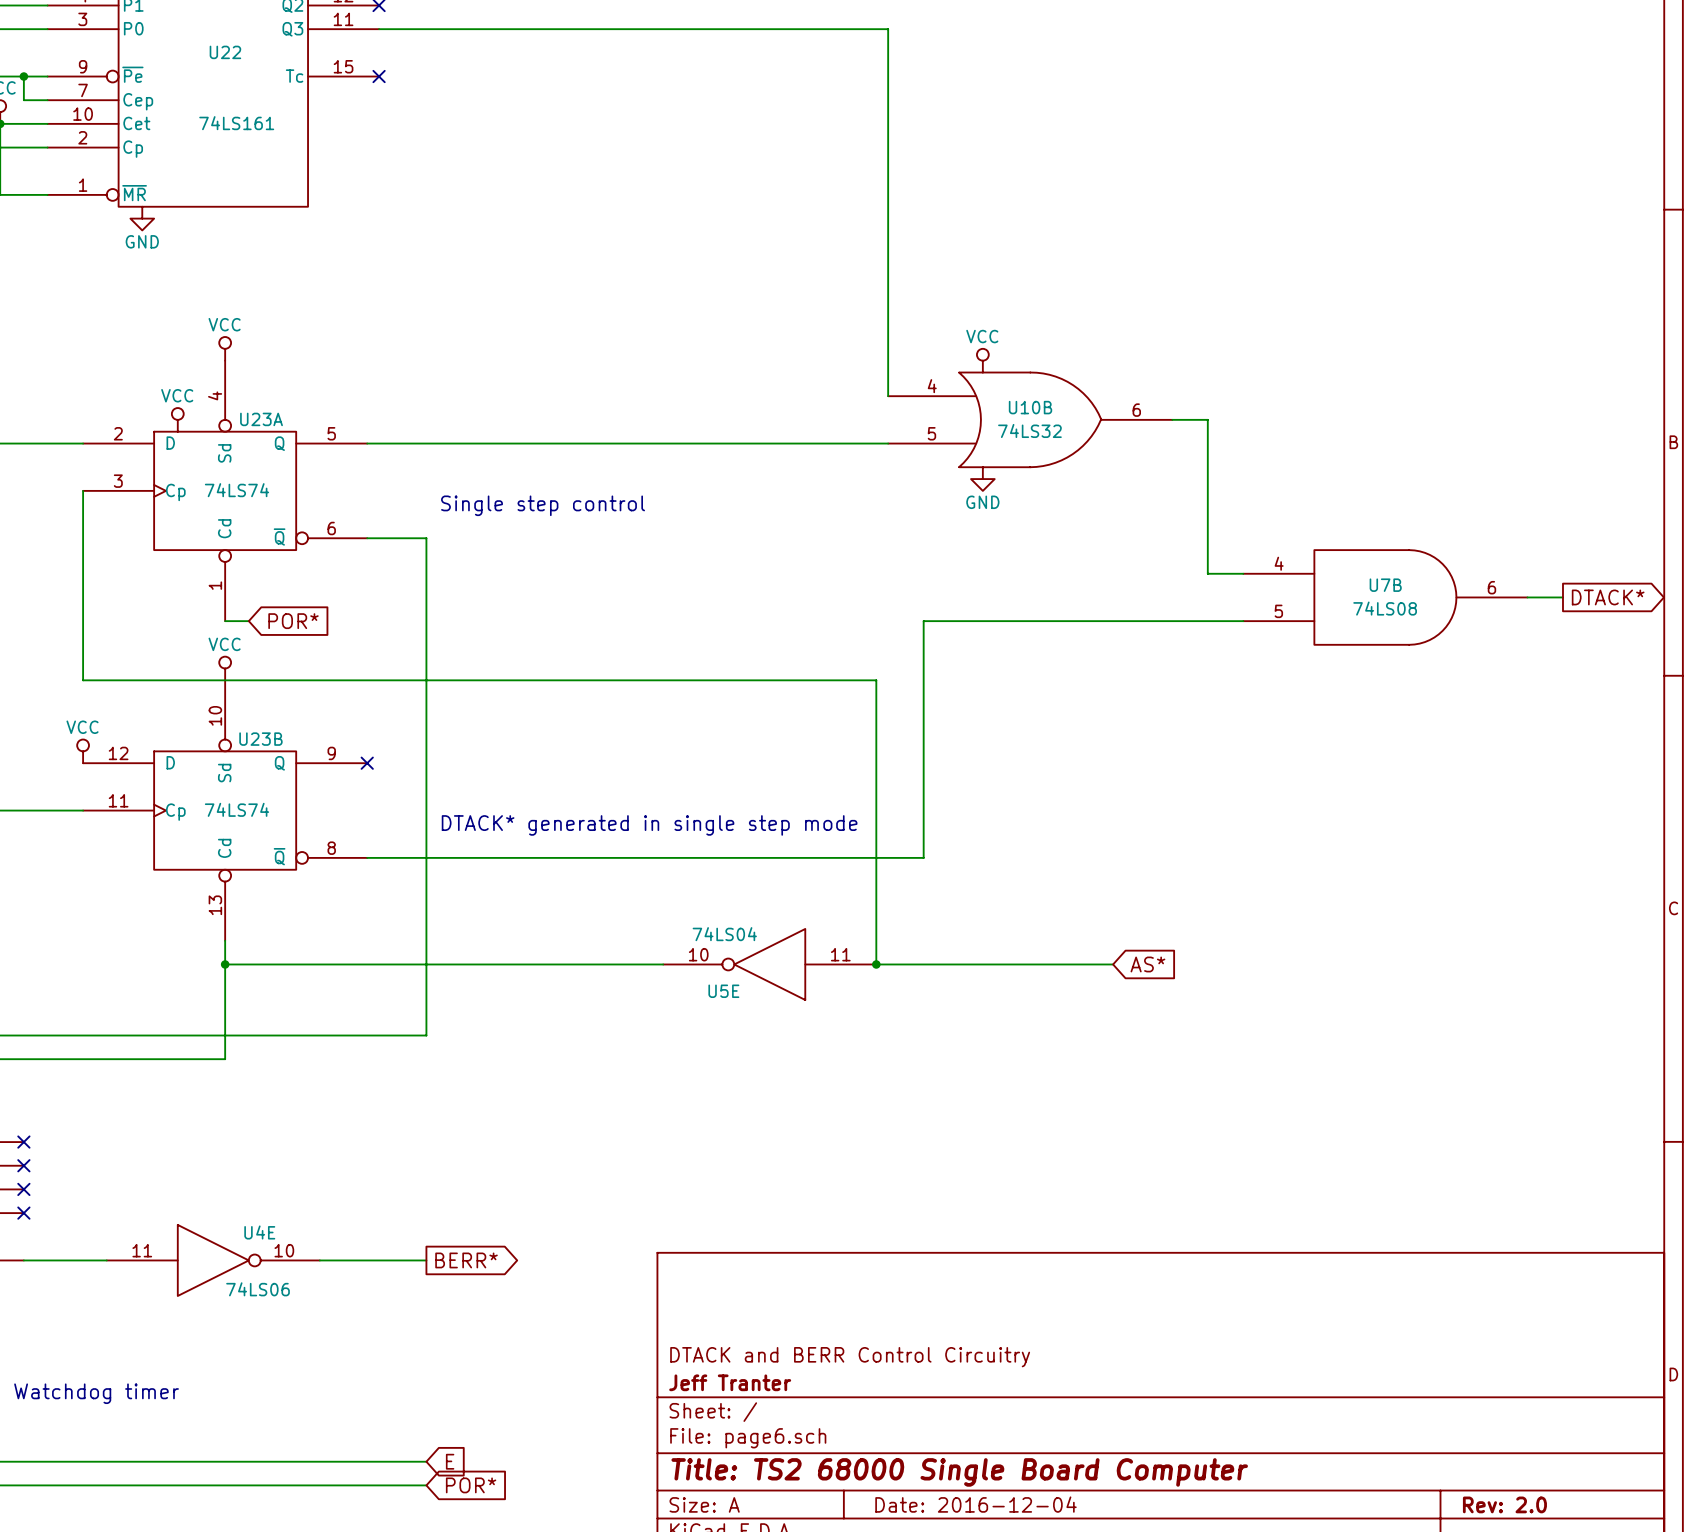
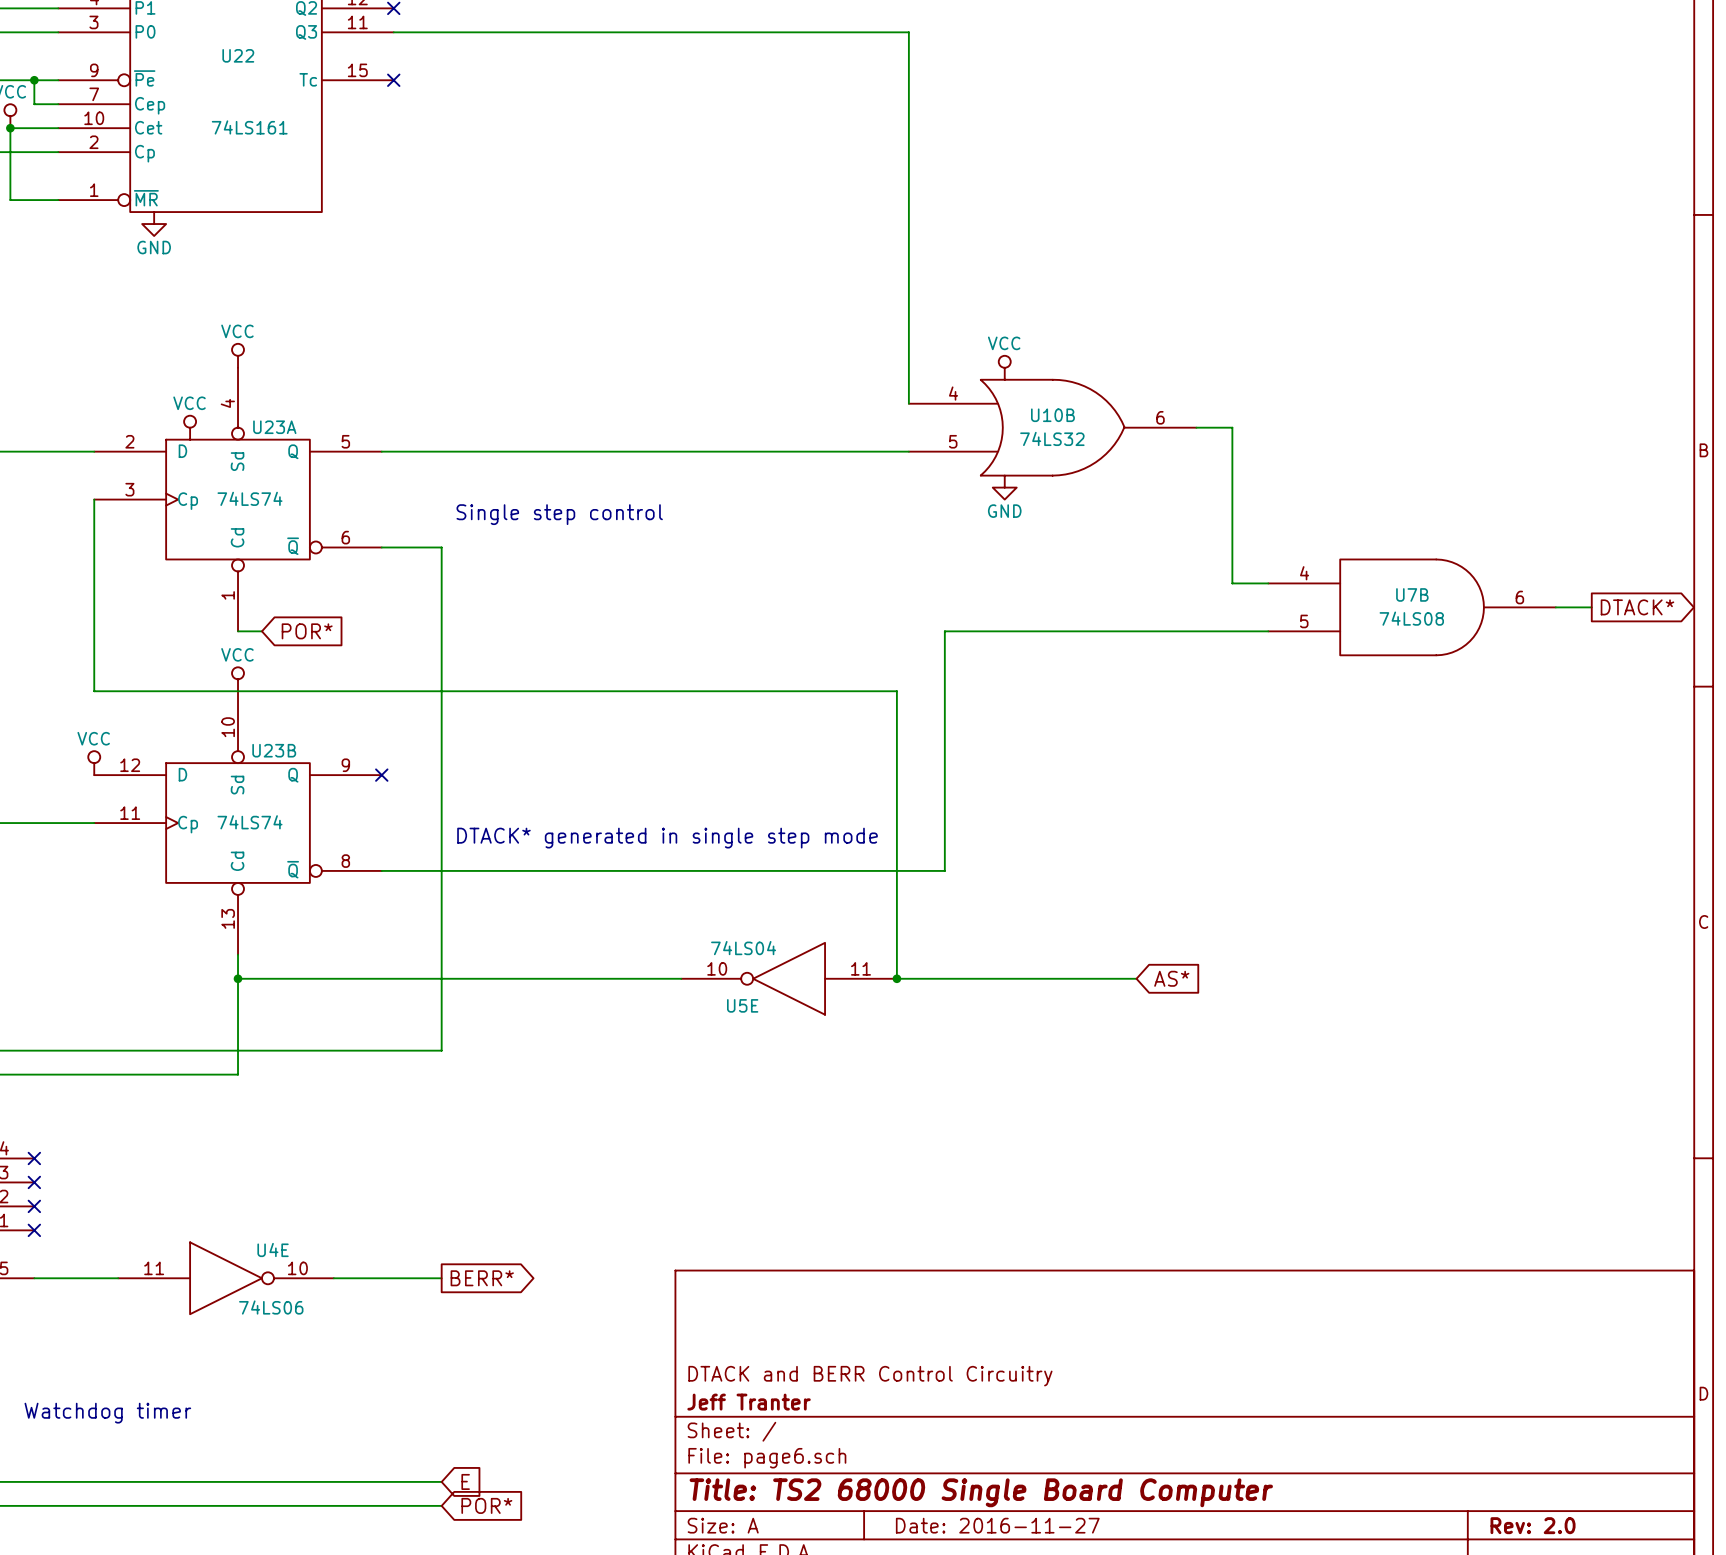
title block: Date: 2016-12-04 (975, 1504) -> Date: 2016-11-27 (997, 1525)

